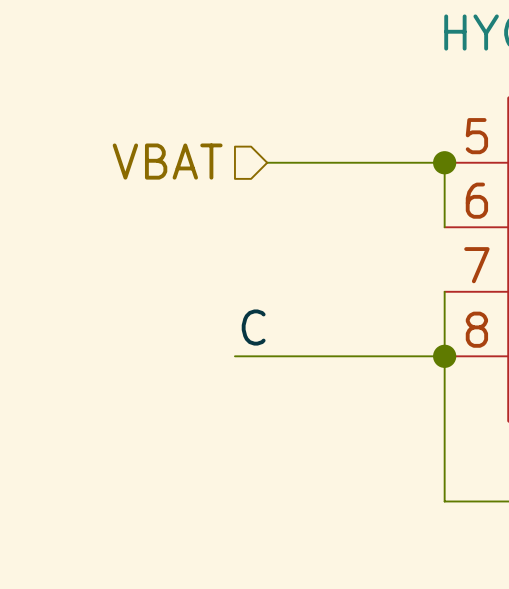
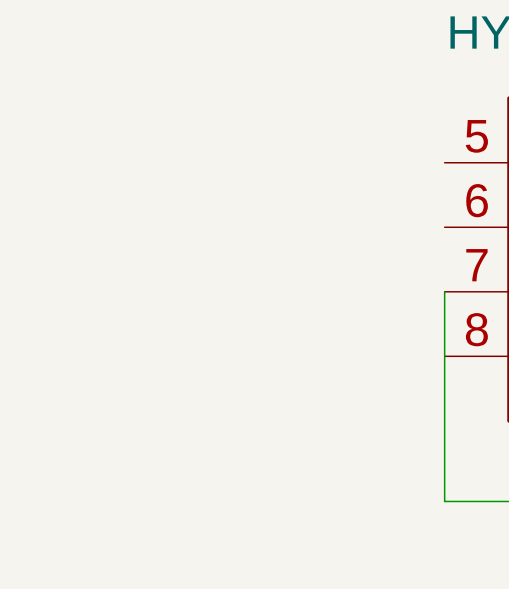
hierarchical label: VBAT (167, 161) -> none
wire: (267, 162) (444, 162) (444, 227) -> none
junction: (444, 162) -> none
label: C (253, 327) -> none
wire: (234, 356) (444, 356) -> none
junction: (444, 356) -> none

